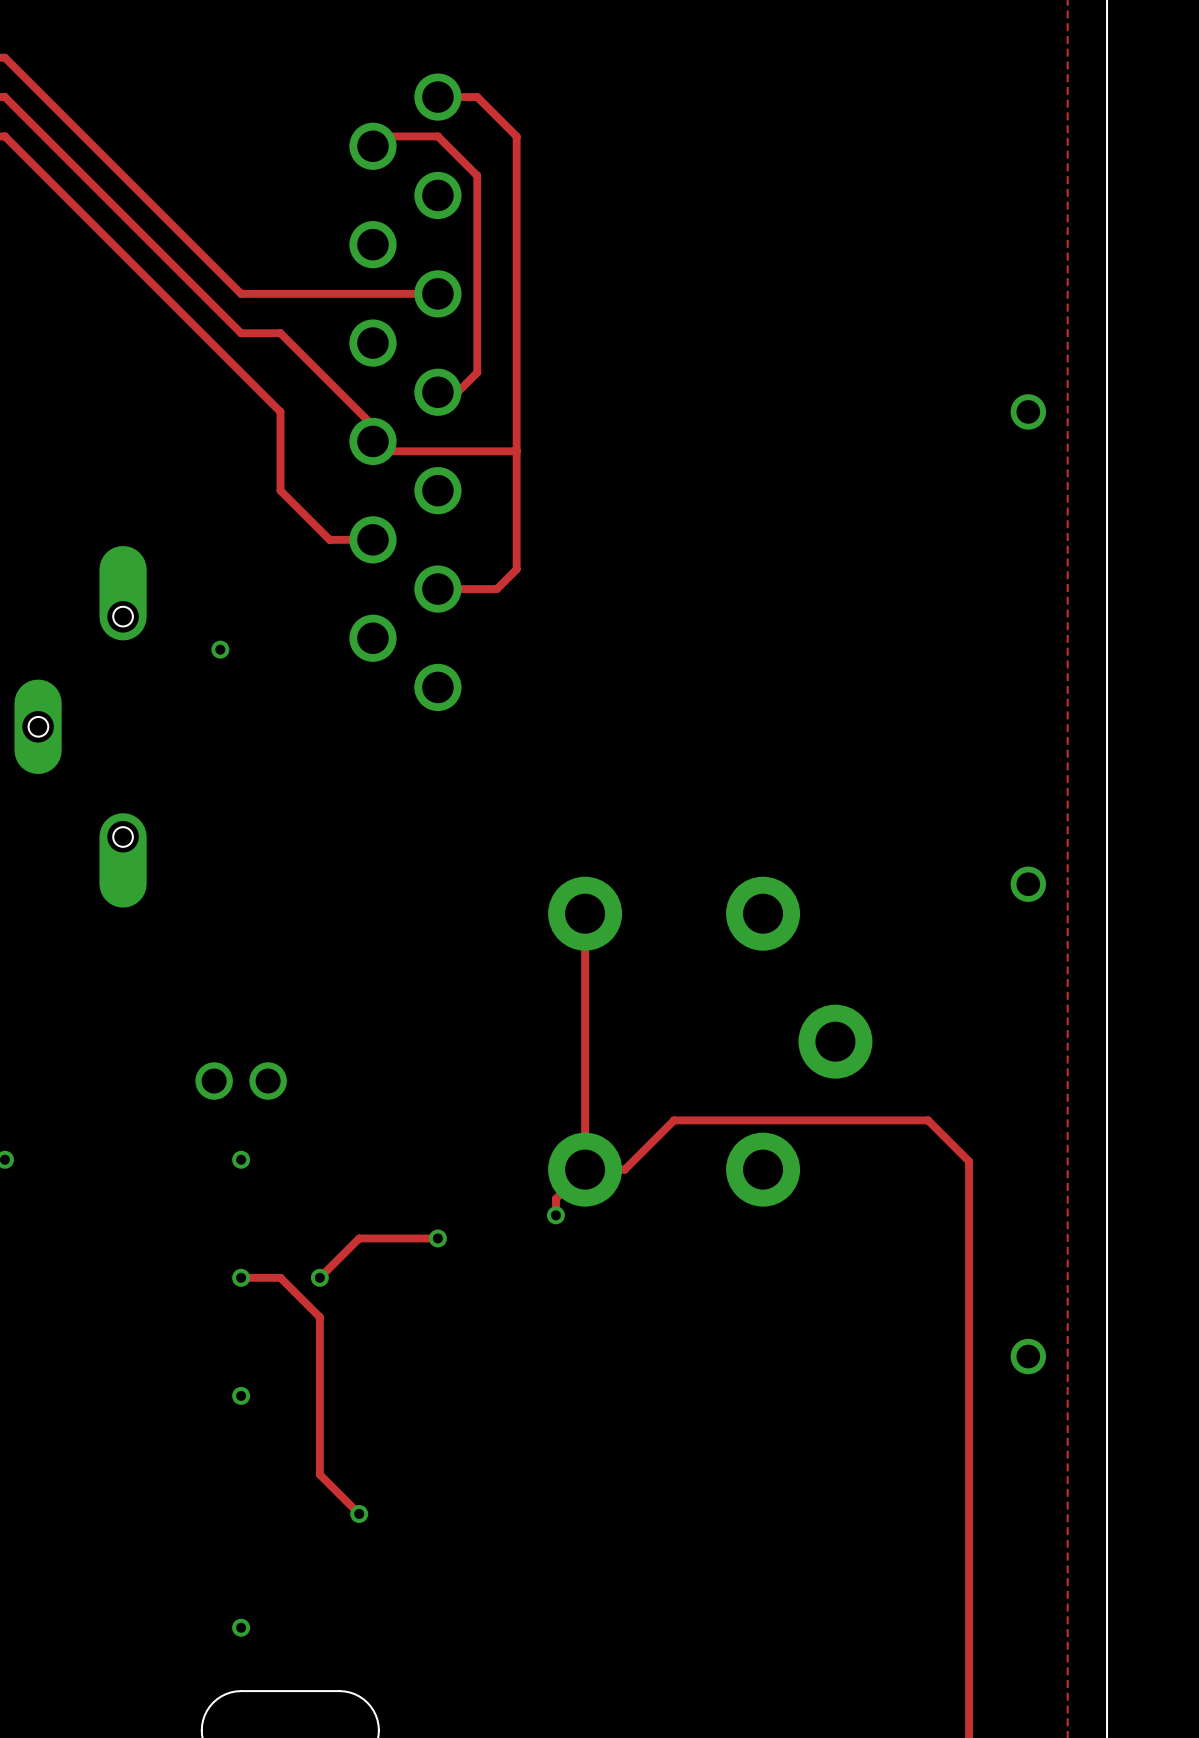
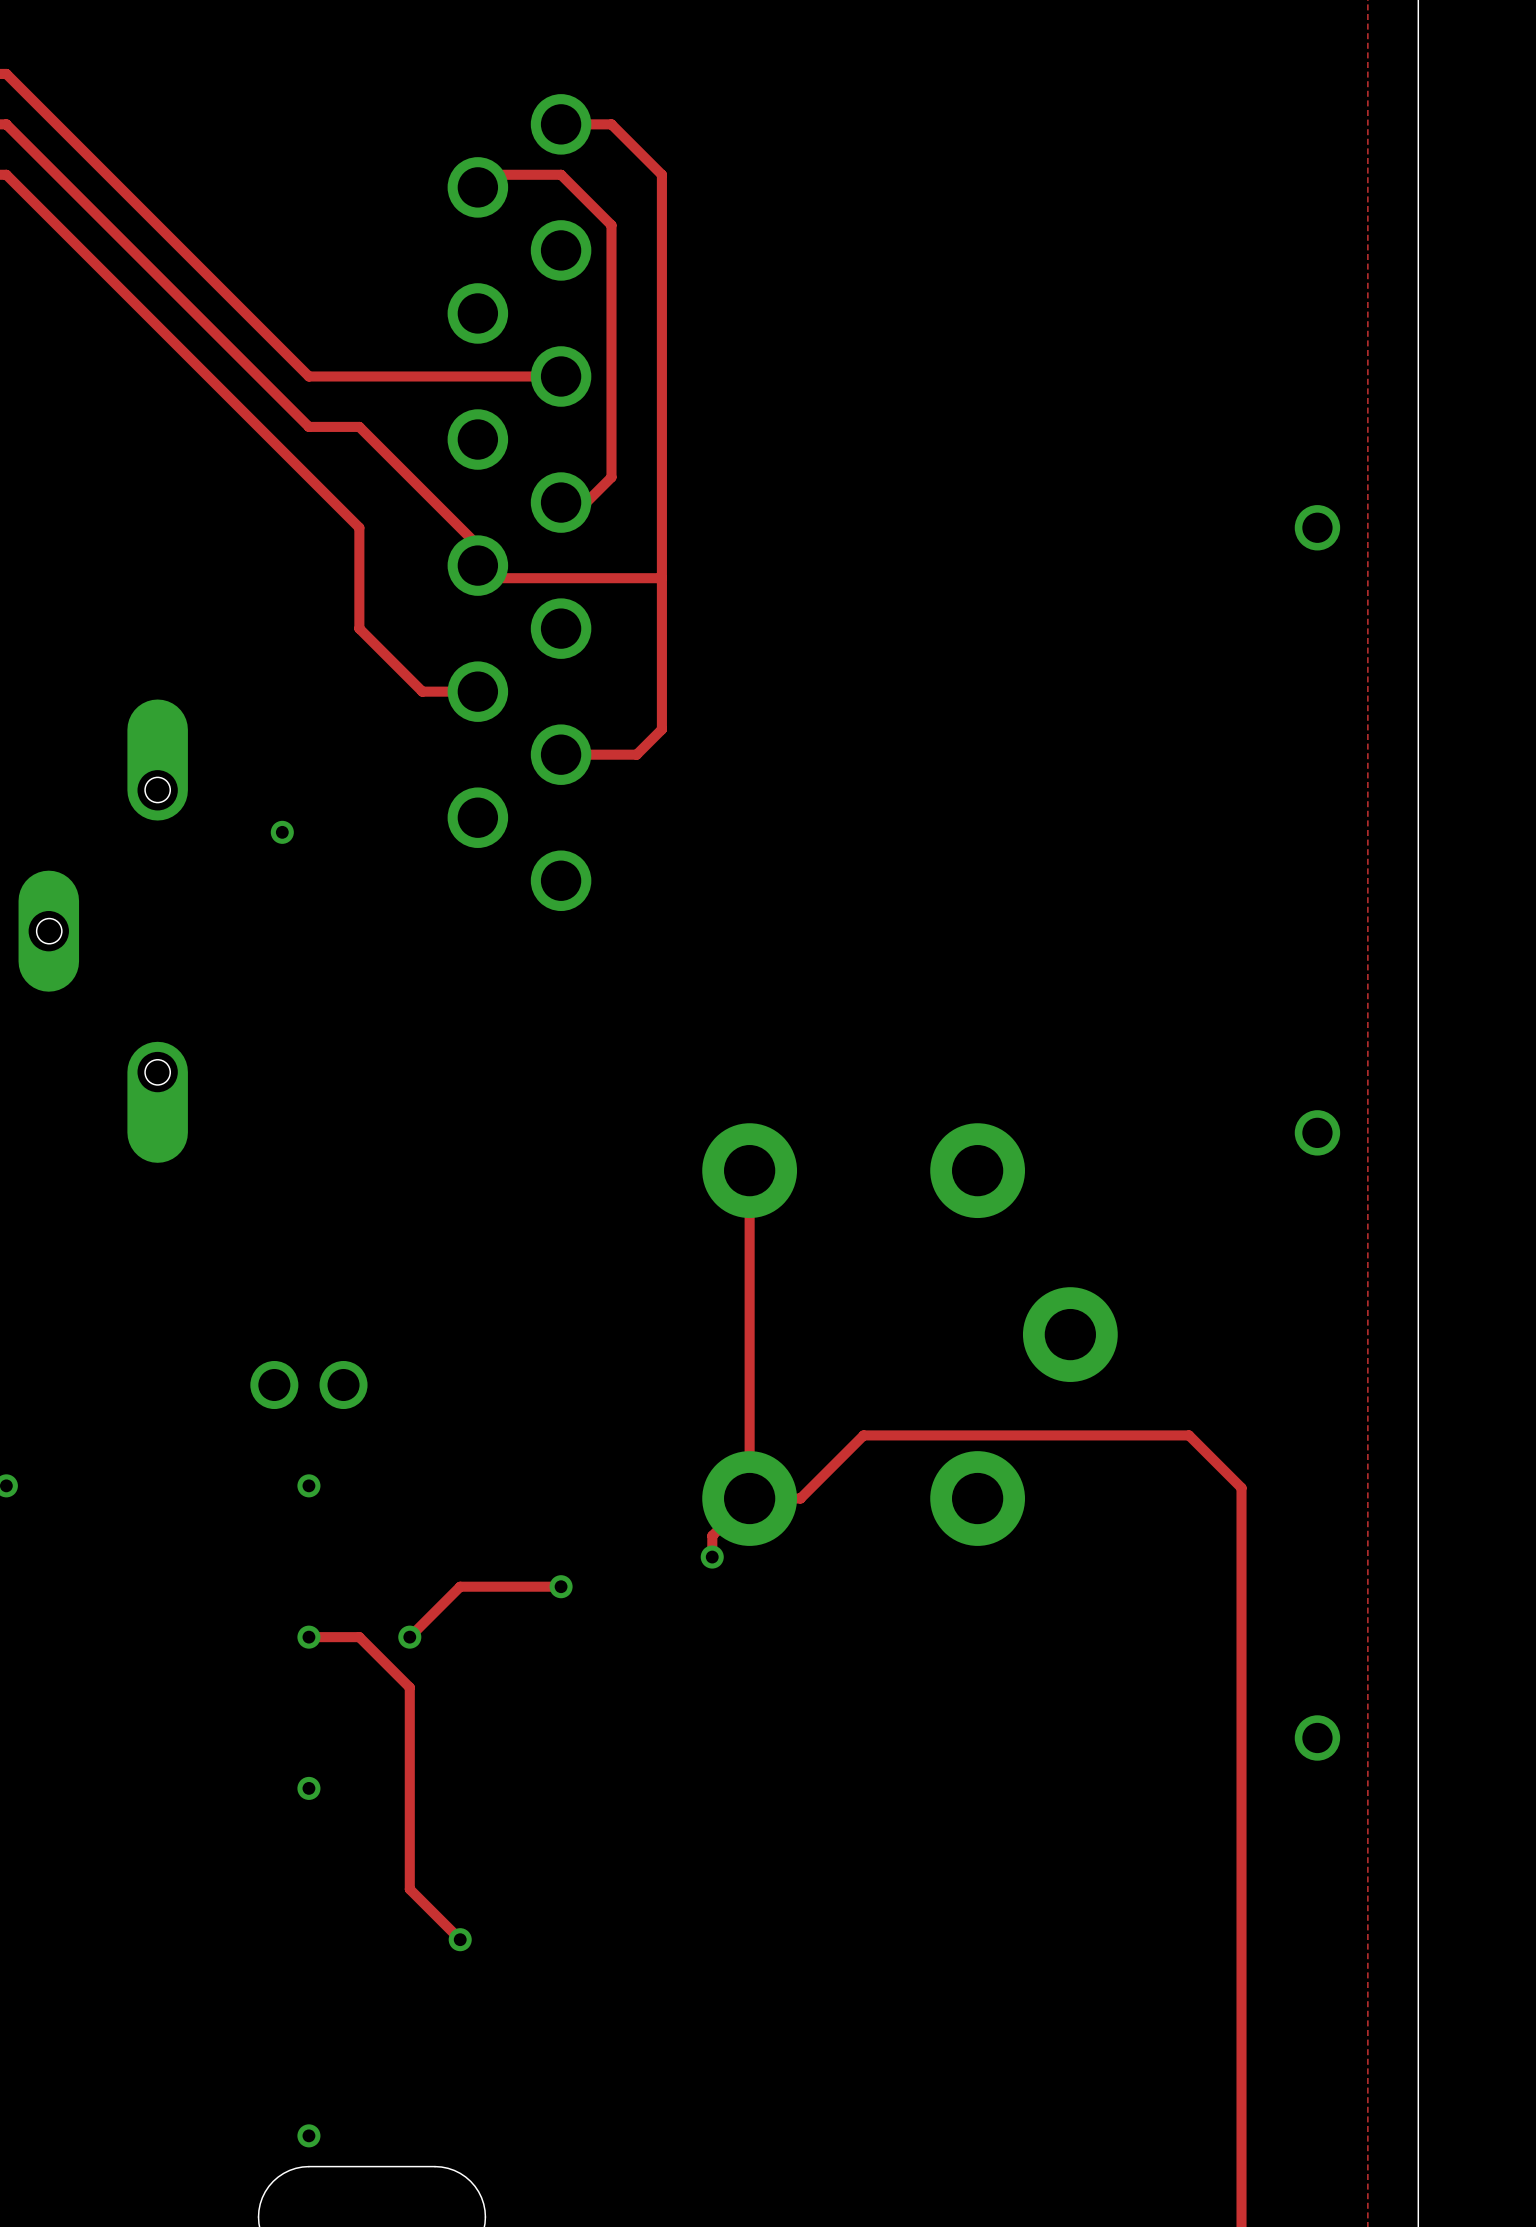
via position: (241, 1627) -> (308, 2135)

